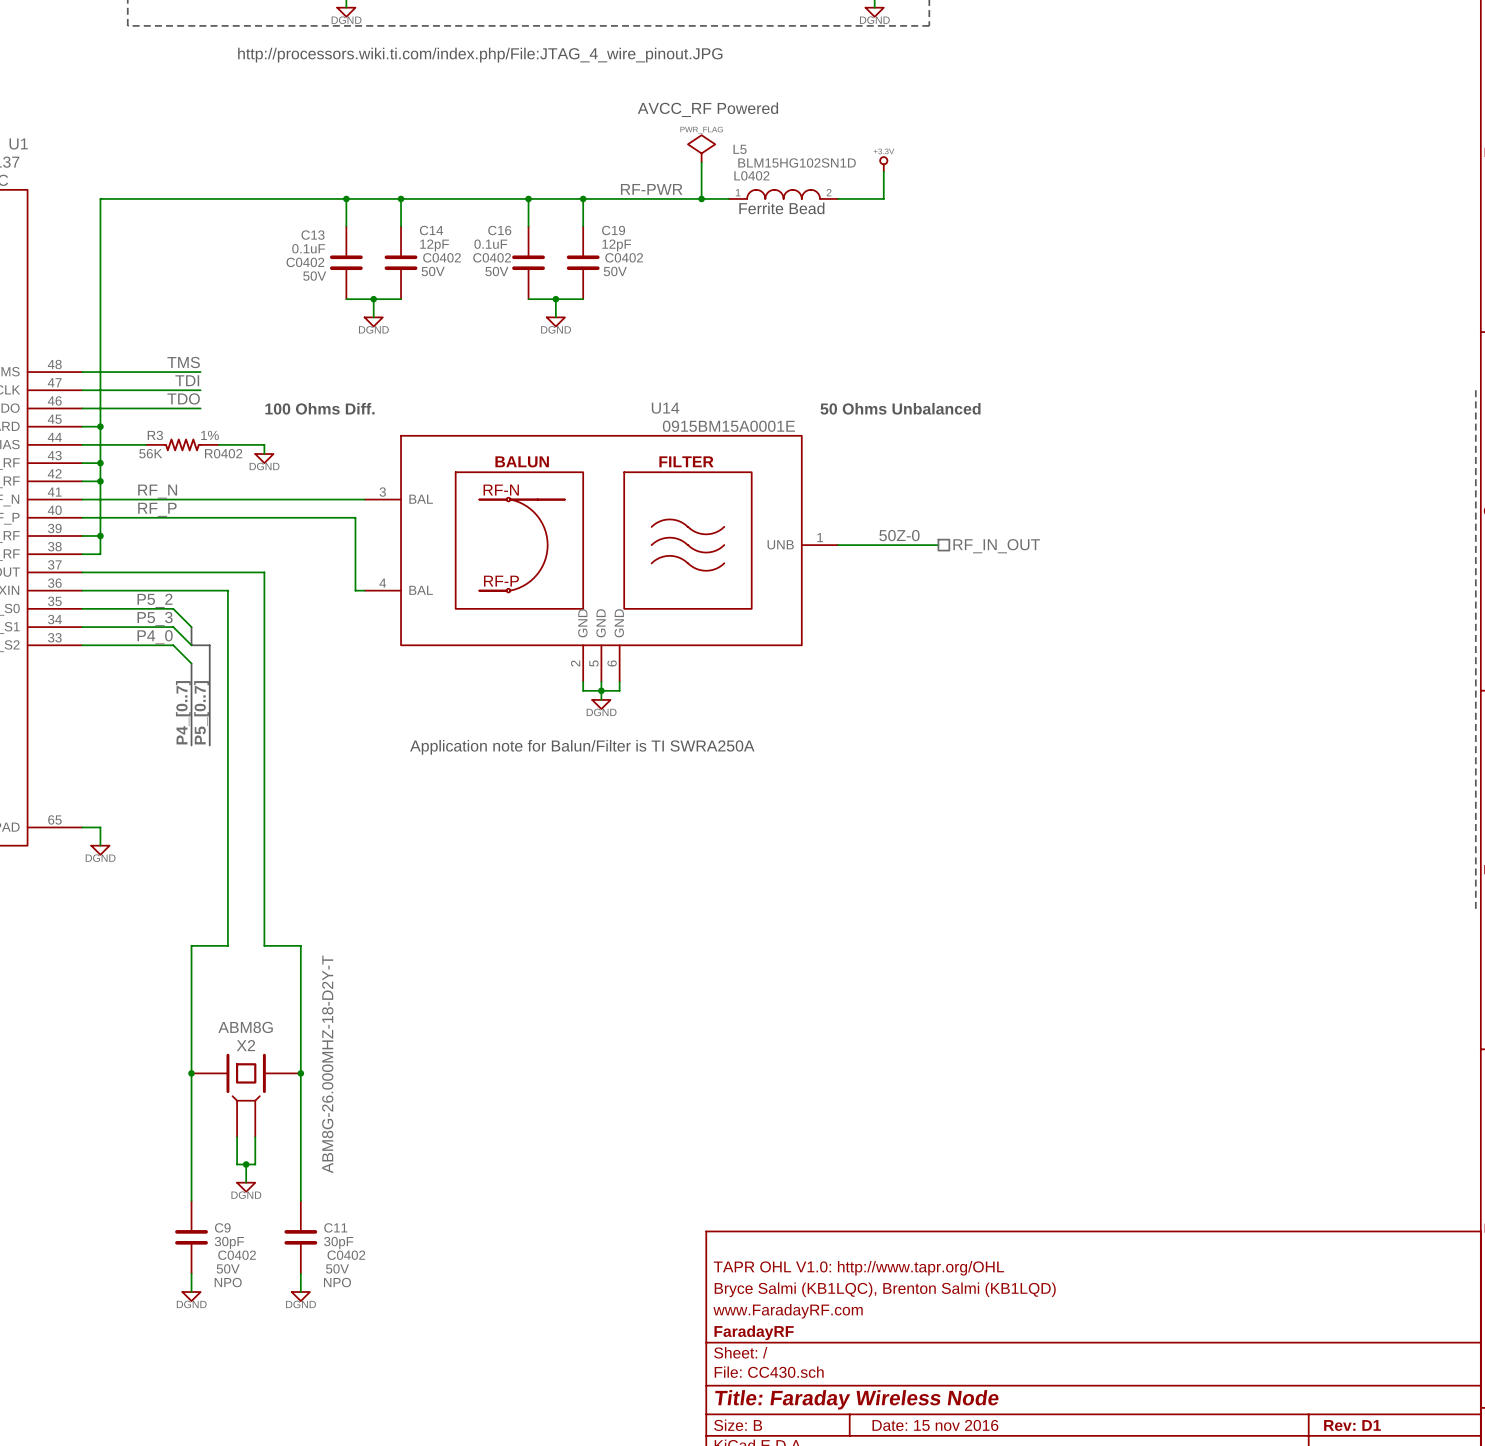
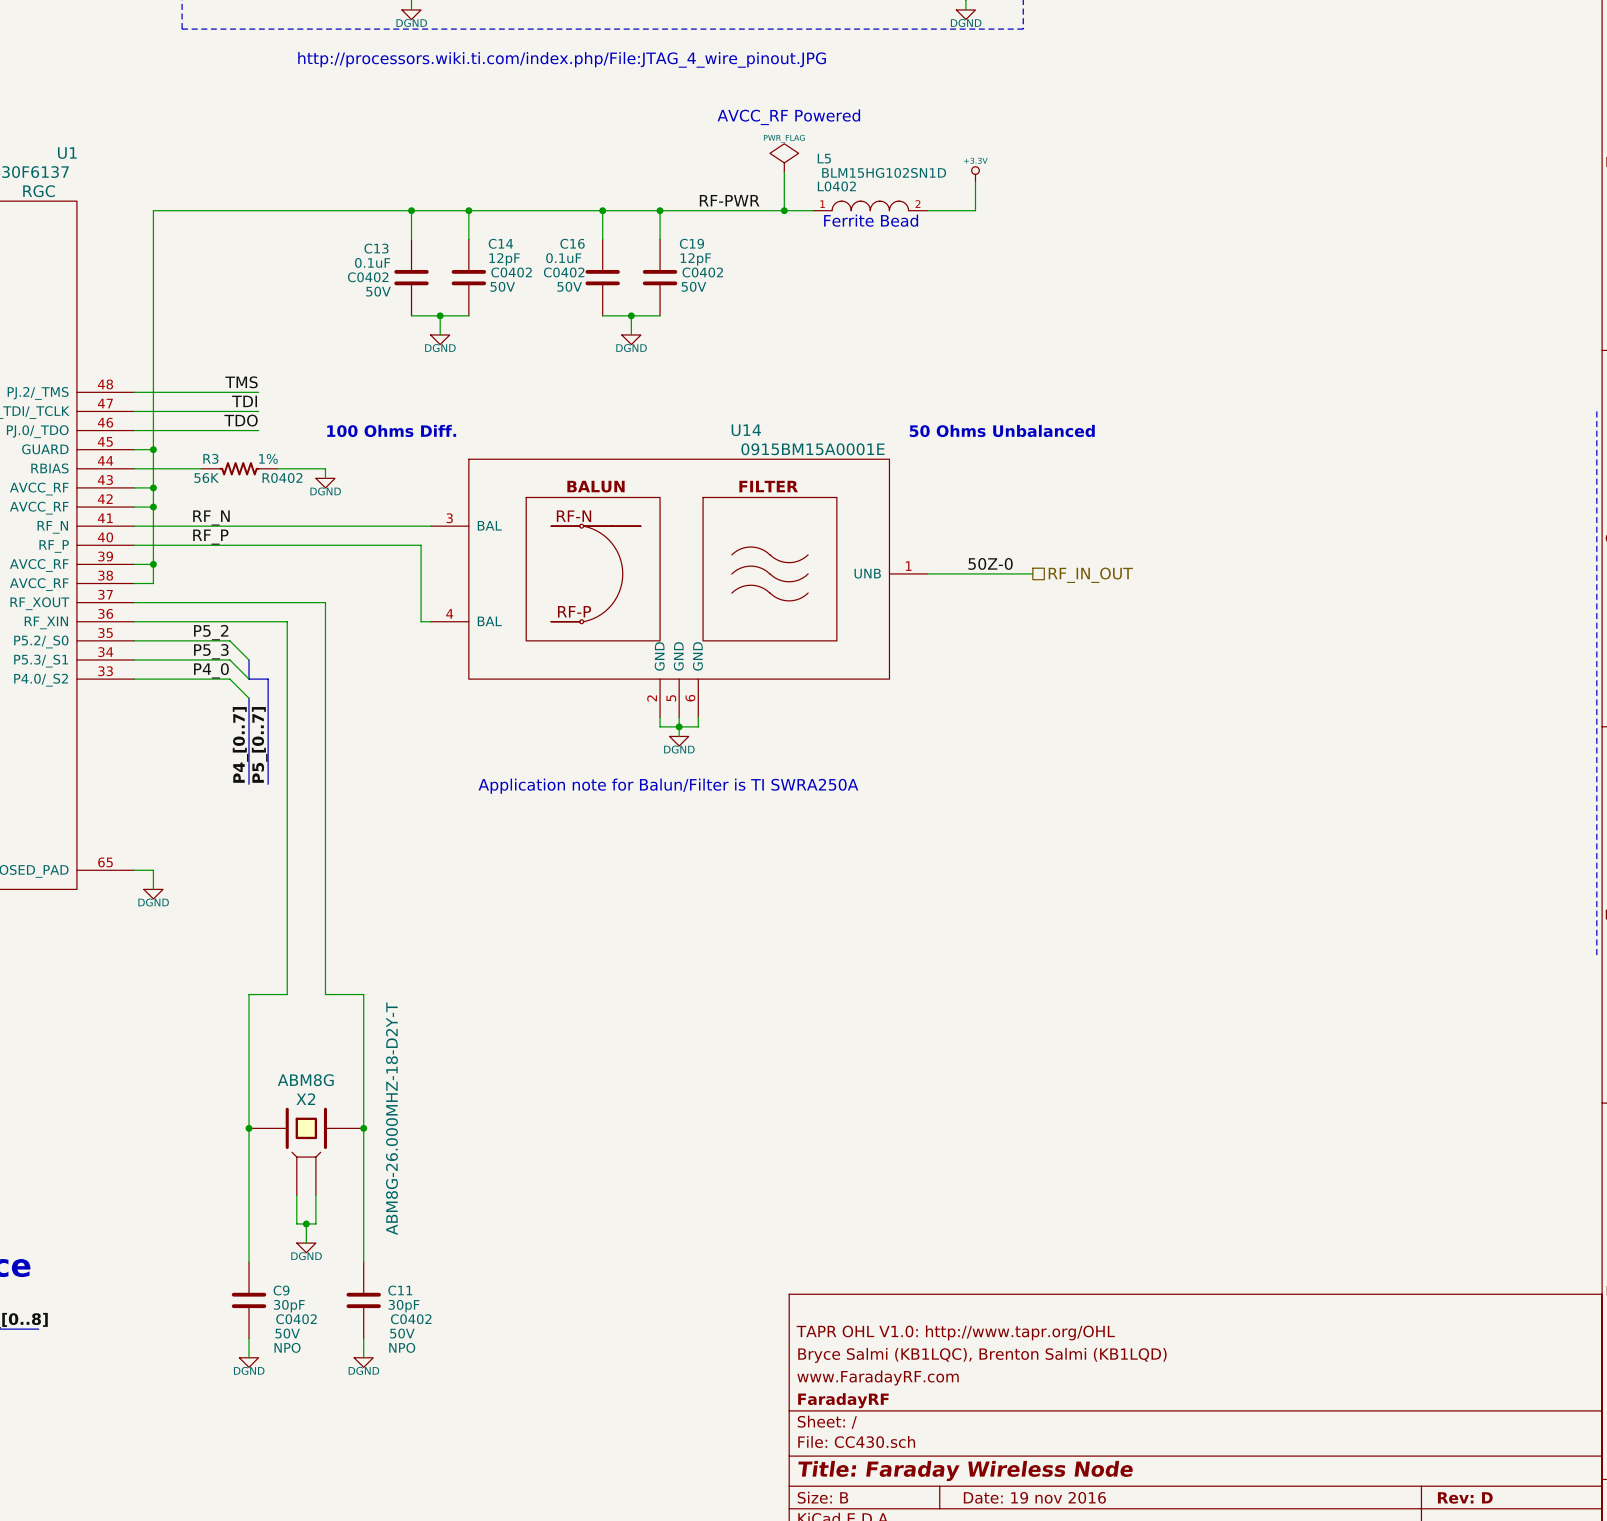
title block: Date: 15 nov 2016 (935, 1425) -> Date: 19 nov 2016 (1034, 1497)
title block: Rev: D1 (1352, 1425) -> Rev: D (1465, 1497)

